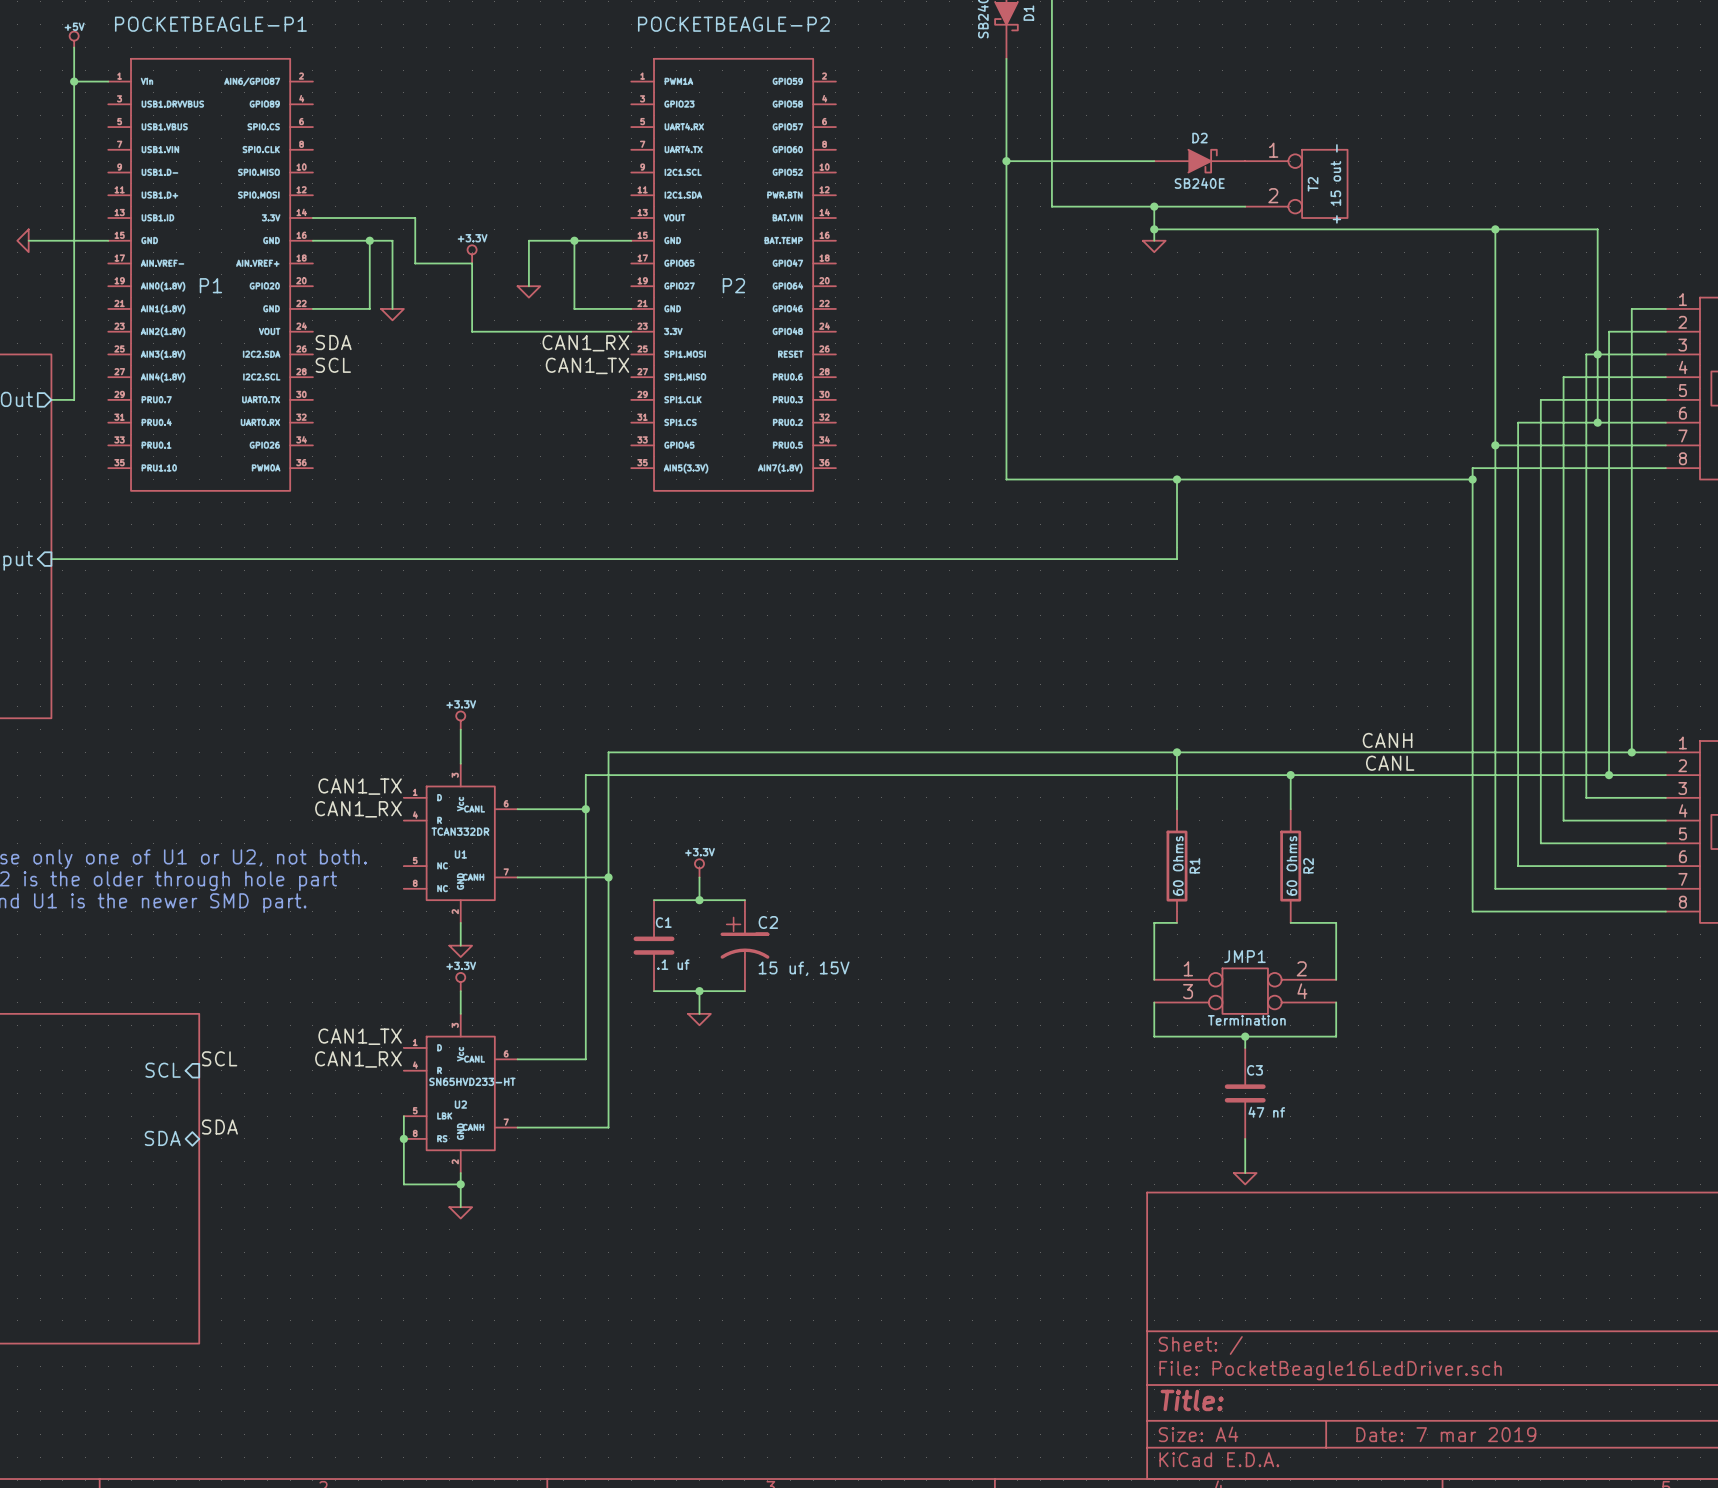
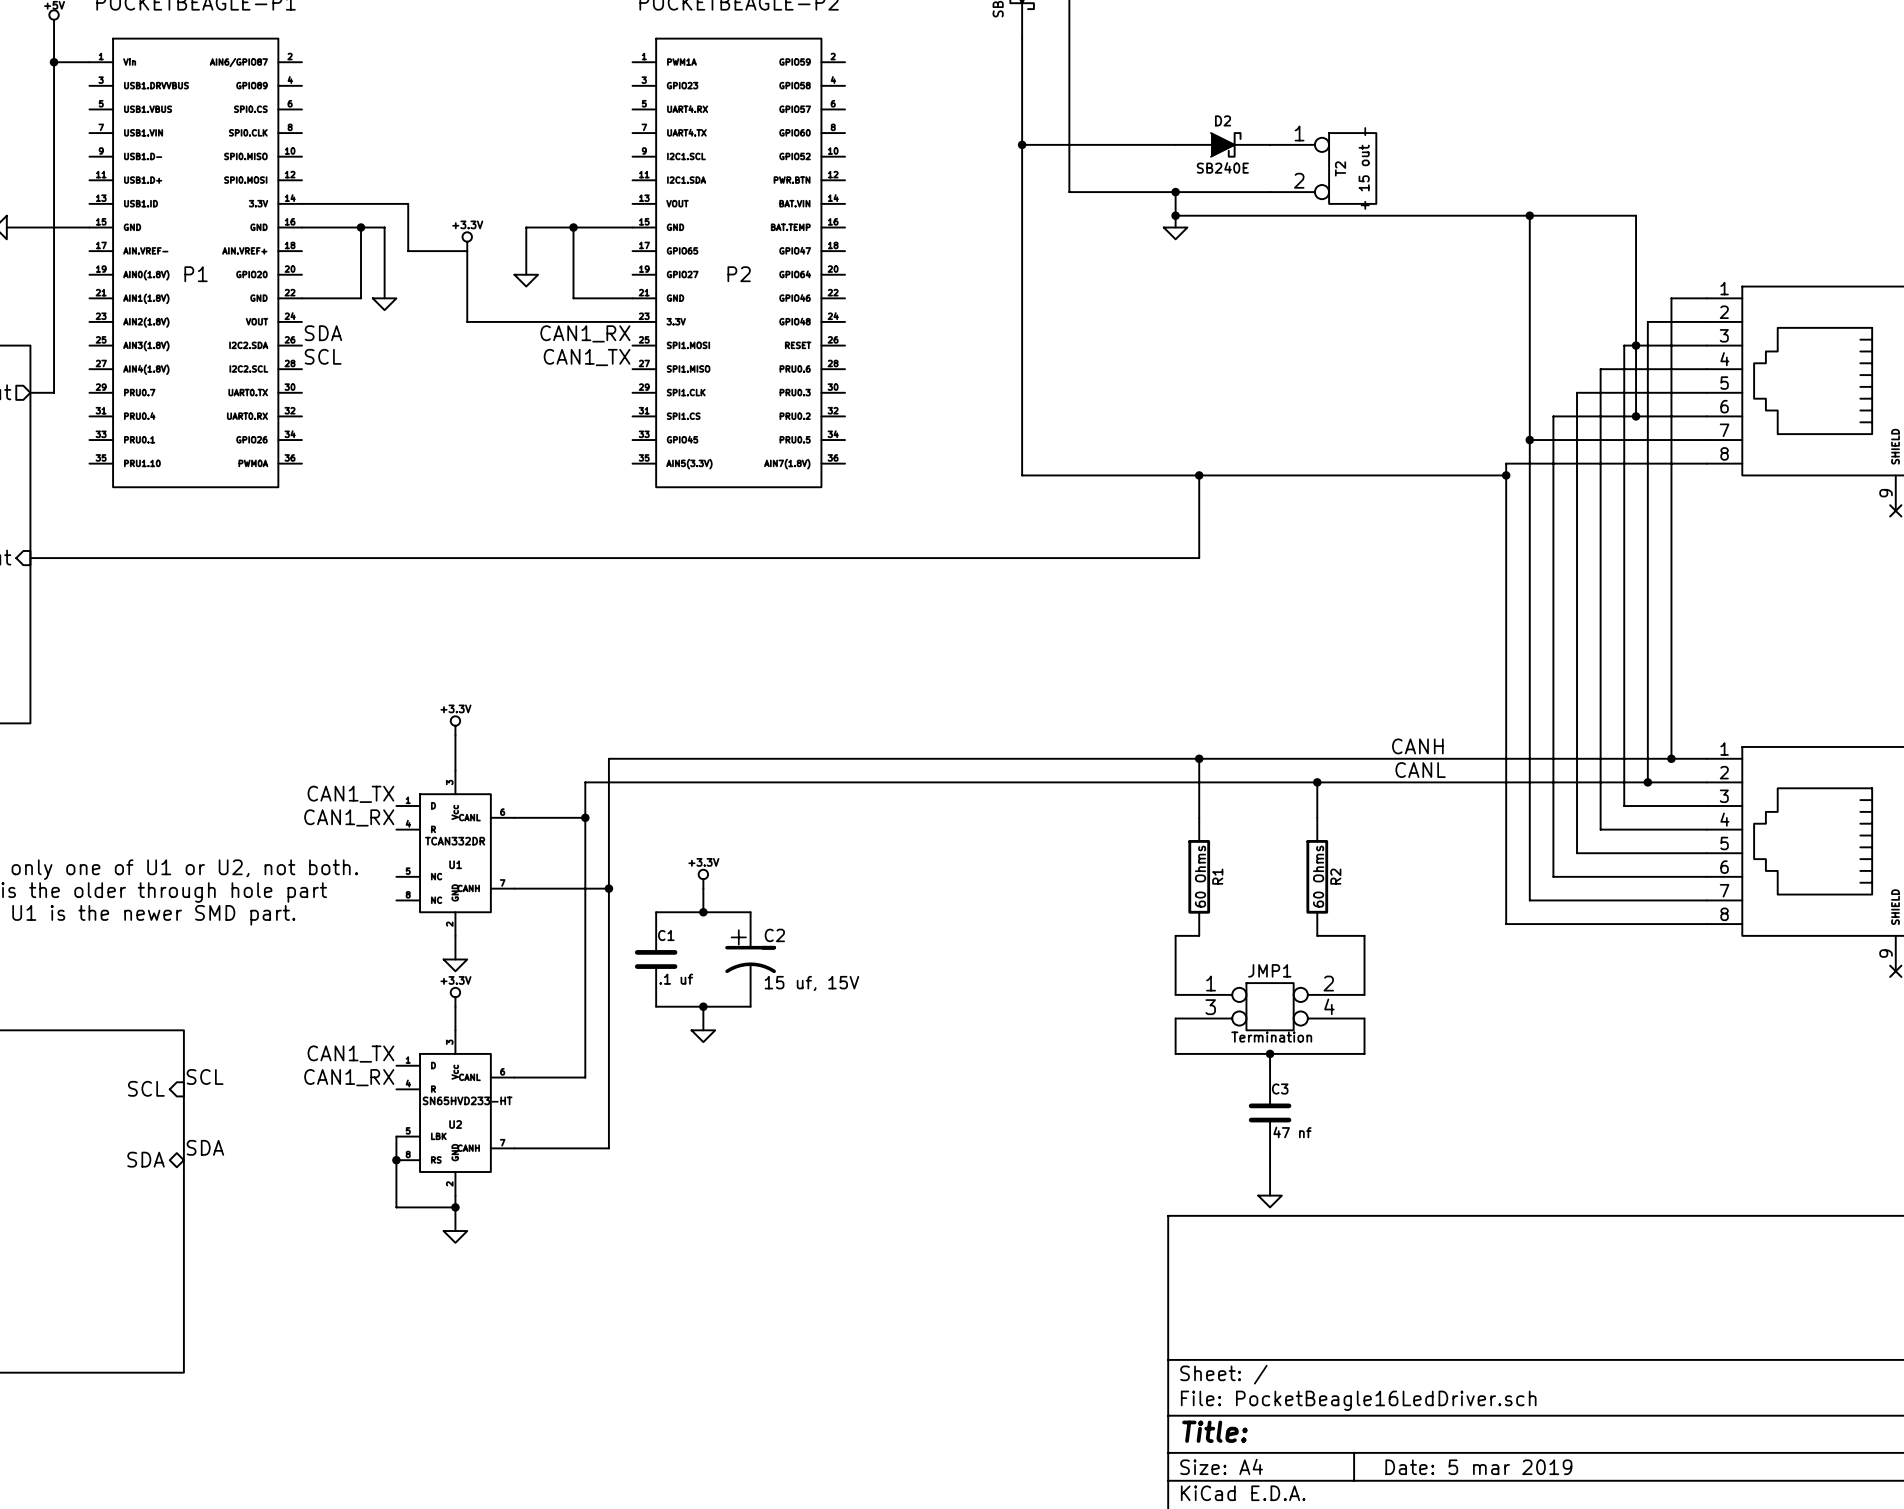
title block: Date: 7 mar 2019 (1446, 1434) -> Date: 5 mar 2019 (1478, 1467)

